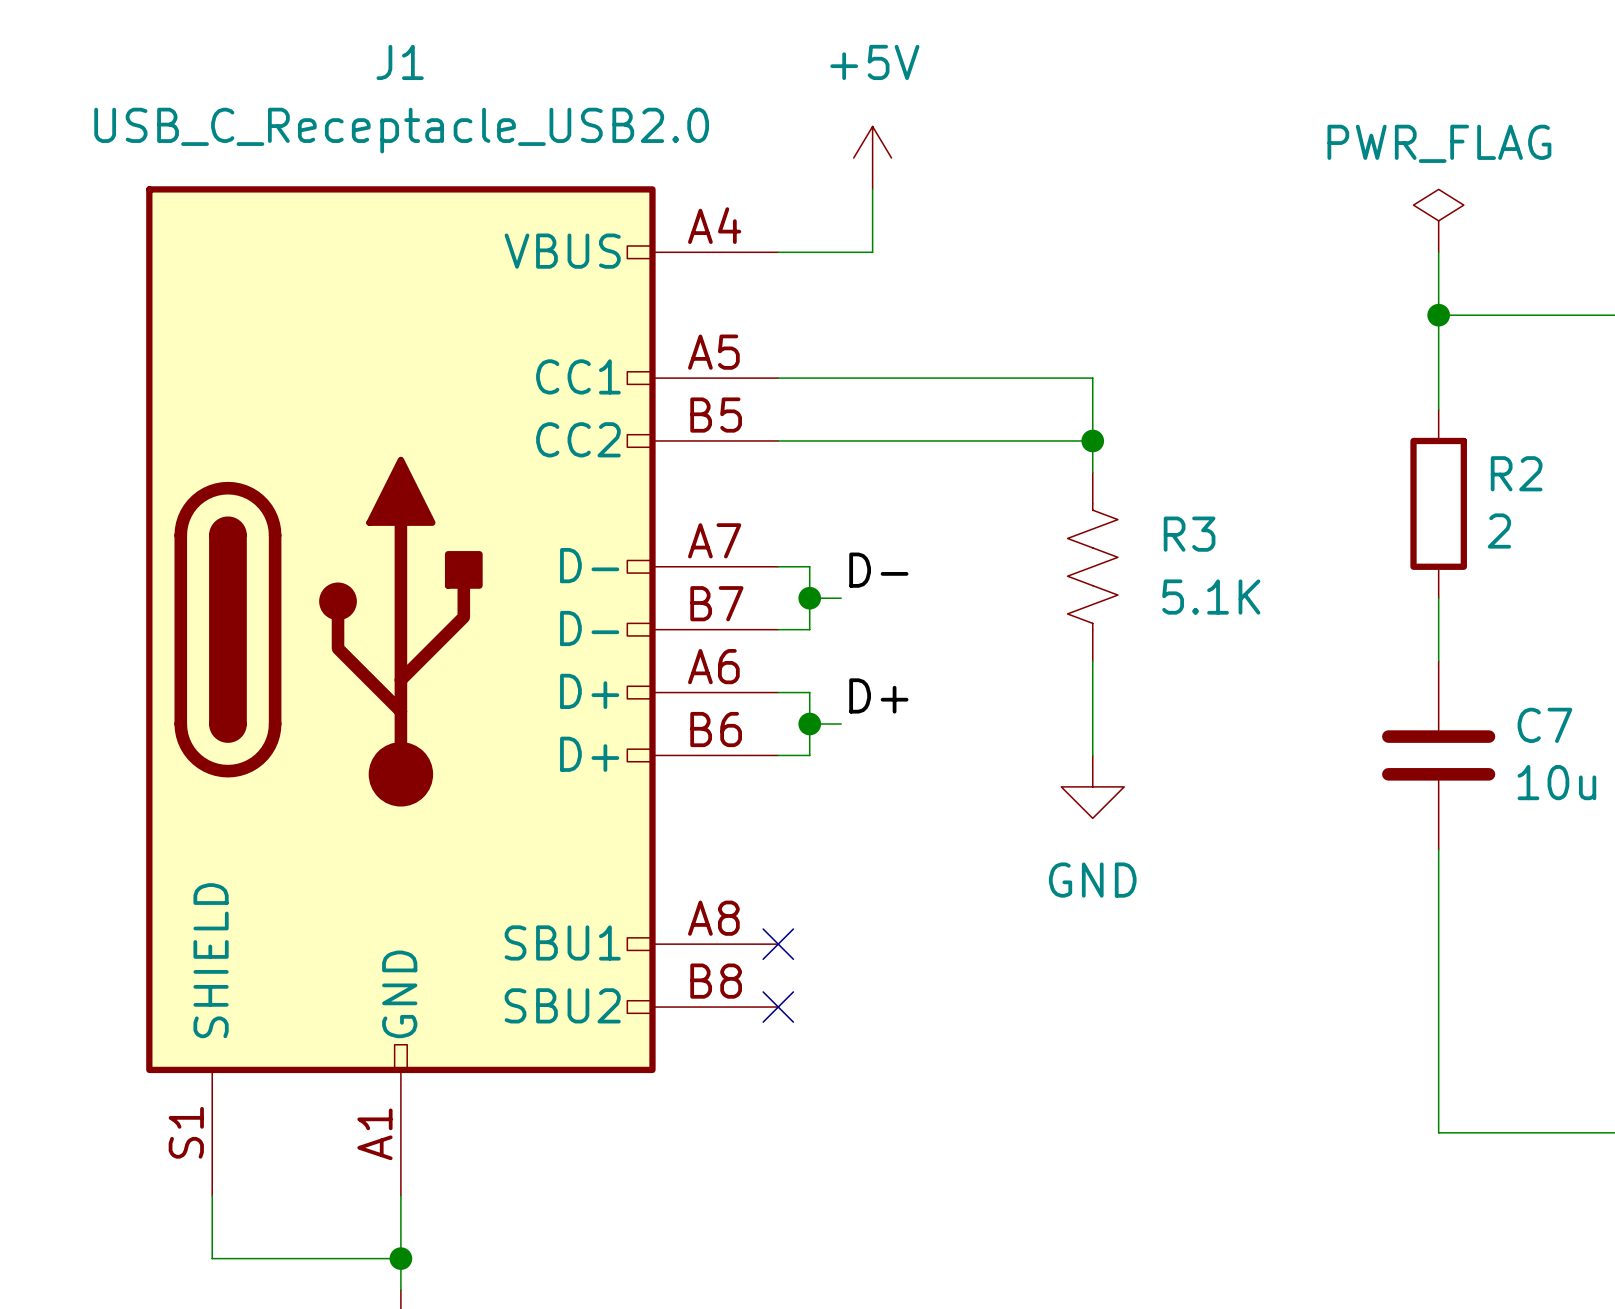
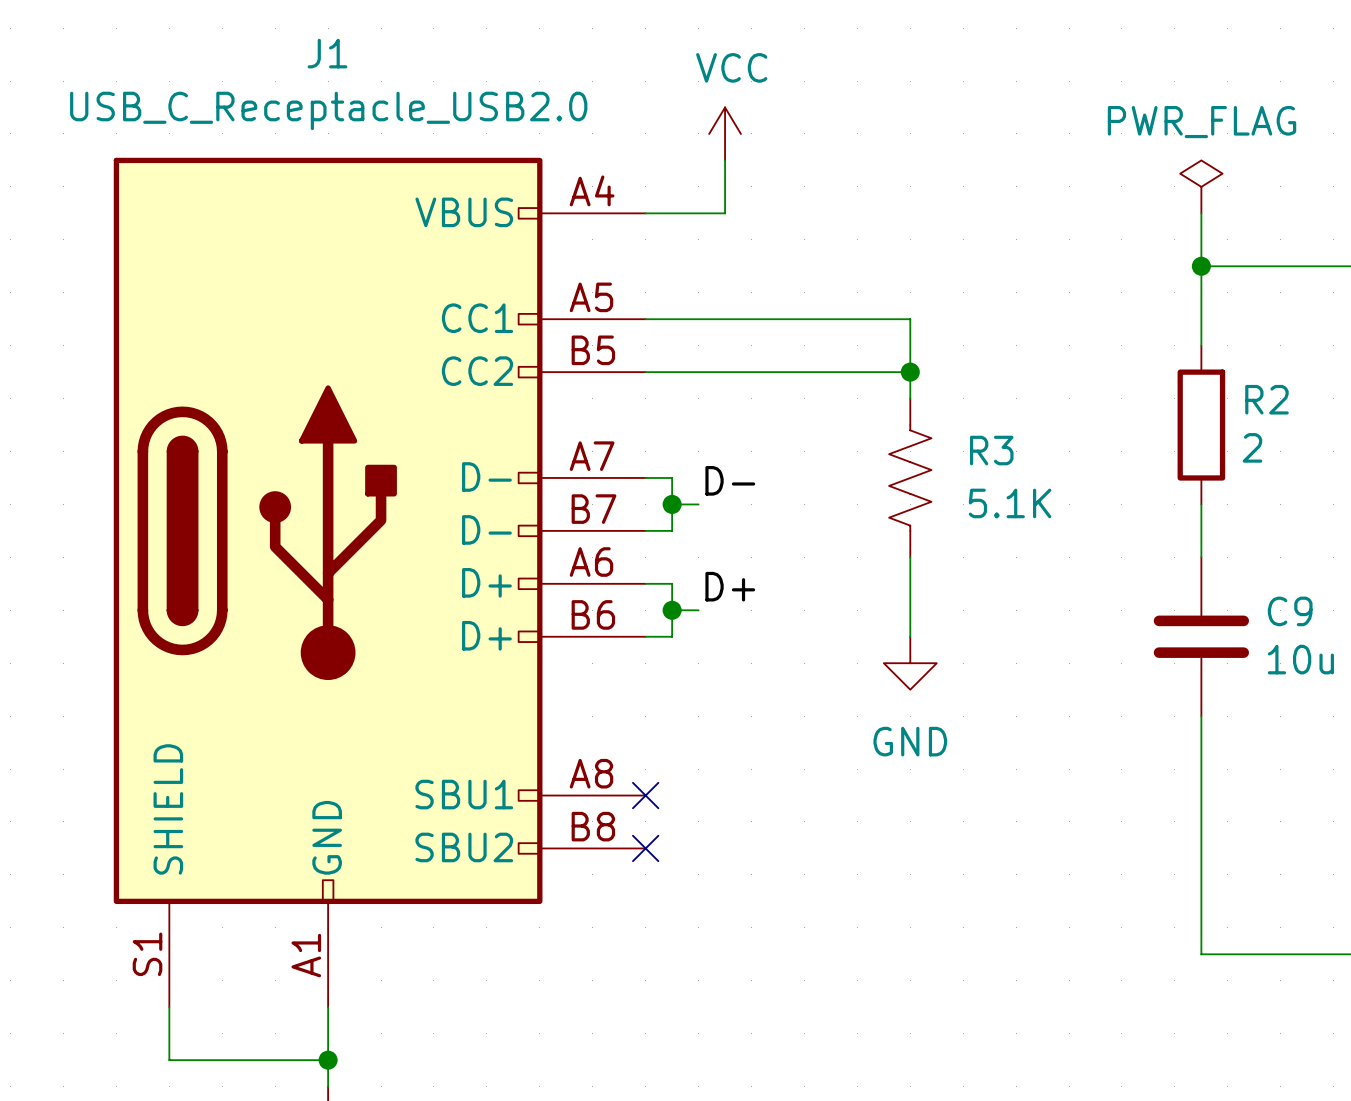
power symbol: +5V (872, 157) -> VCC (725, 133)
C7 name: C7 (1544, 725) -> C9 (1290, 611)

